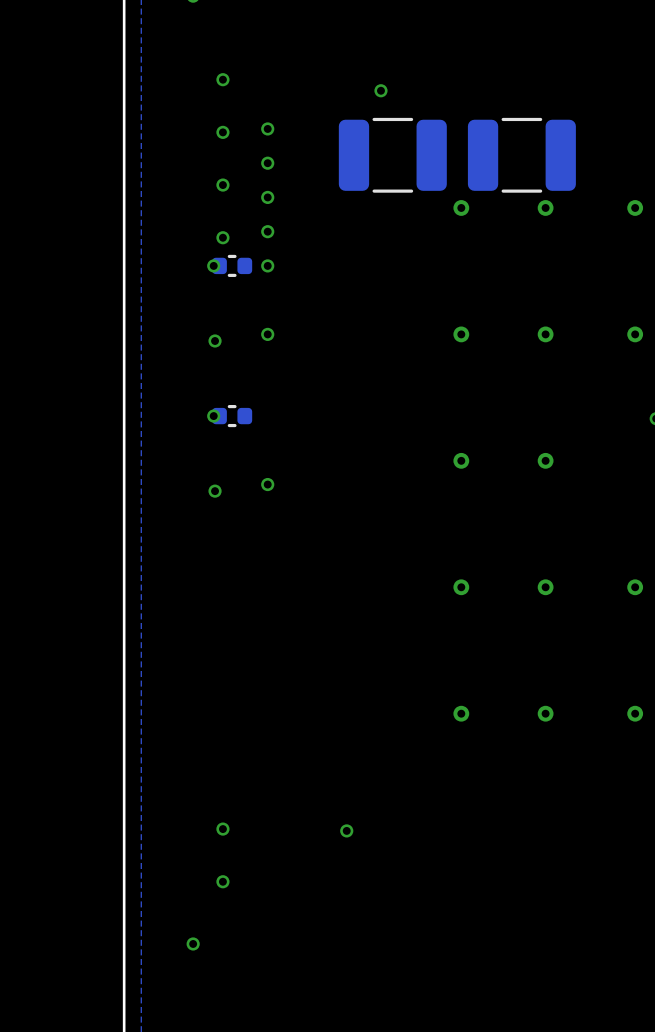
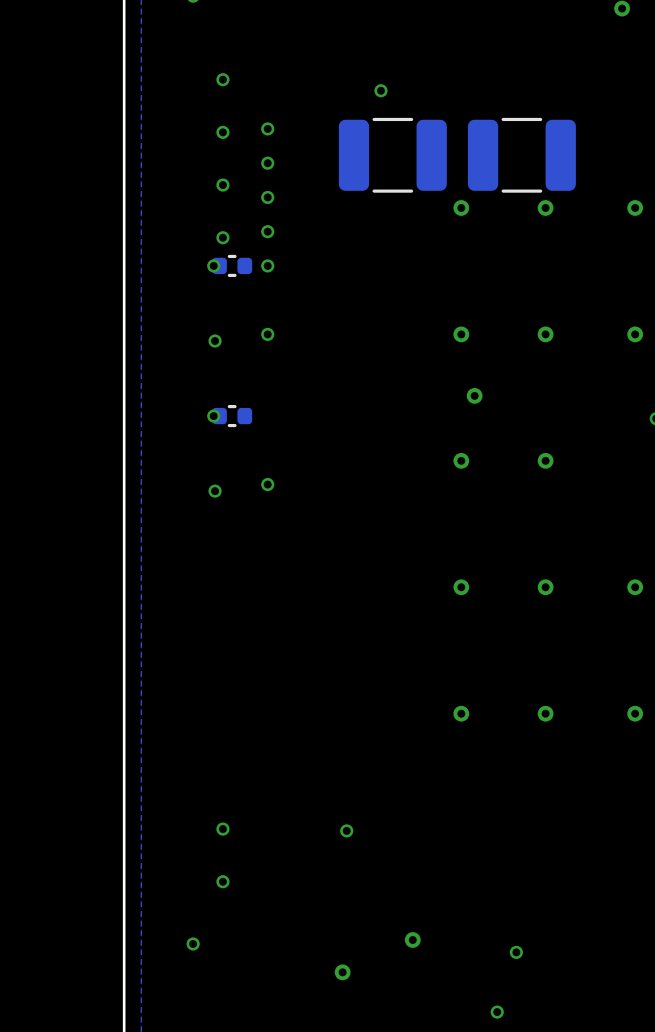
via: none -> (622, 8)
via: none -> (474, 395)
via: none -> (412, 939)
via: none -> (516, 952)
via: none -> (342, 972)
via: none -> (497, 1012)

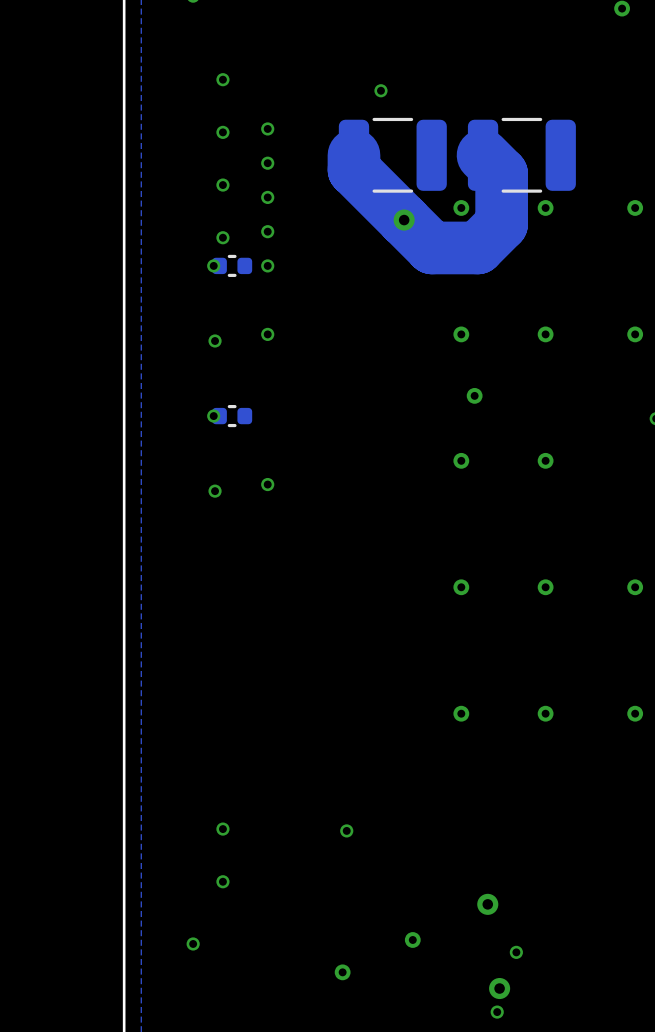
track: none -> (483, 155) (501, 173) (501, 224) (477, 247) (432, 247) (353, 169) (353, 155)
via: none -> (404, 220)
via: none -> (487, 904)
via: none -> (499, 988)

